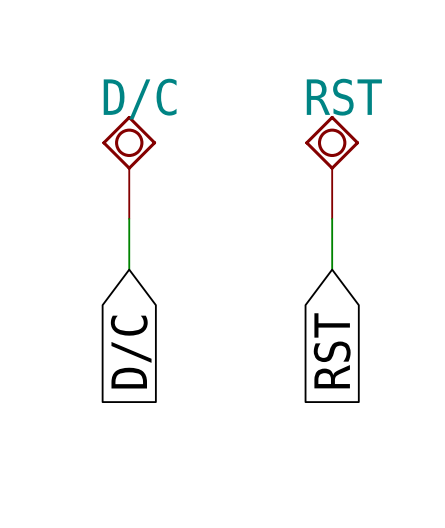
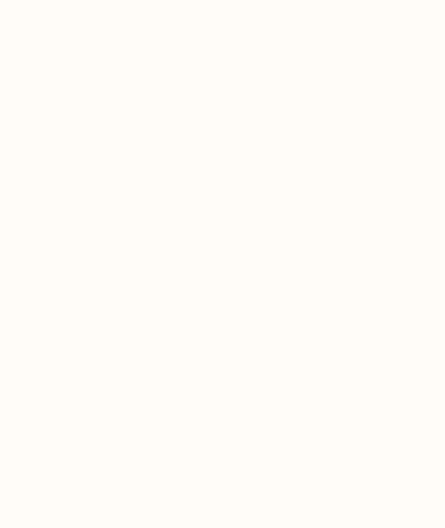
D/C: (129, 167) -> none
RST: (332, 167) -> none
wire: (129, 218) (129, 269) -> none
wire: (332, 218) (332, 269) -> none
global label: RST (332, 350) -> none
global label: D/C (131, 352) -> none

